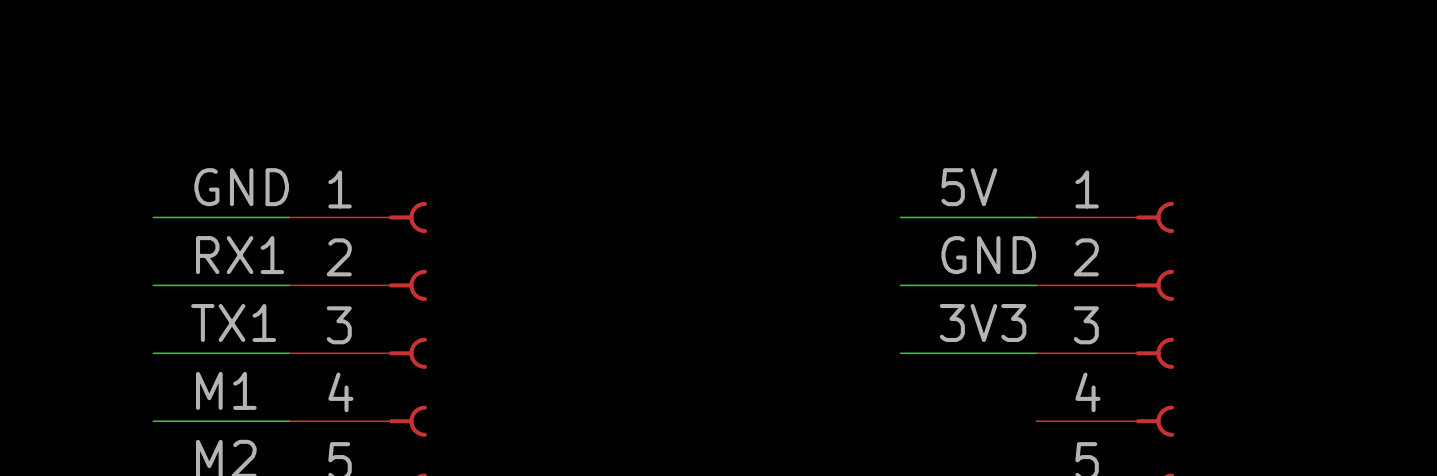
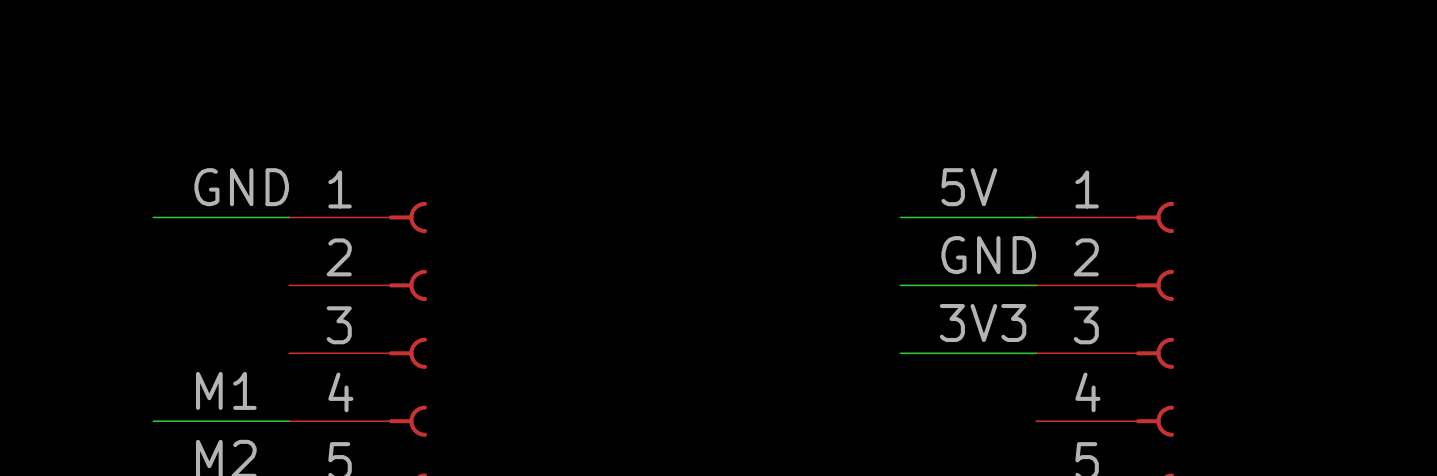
label: RX1 (240, 255) -> none
wire: (153, 285) (289, 285) -> none
label: TX1 (233, 323) -> none
wire: (153, 353) (289, 353) -> none

